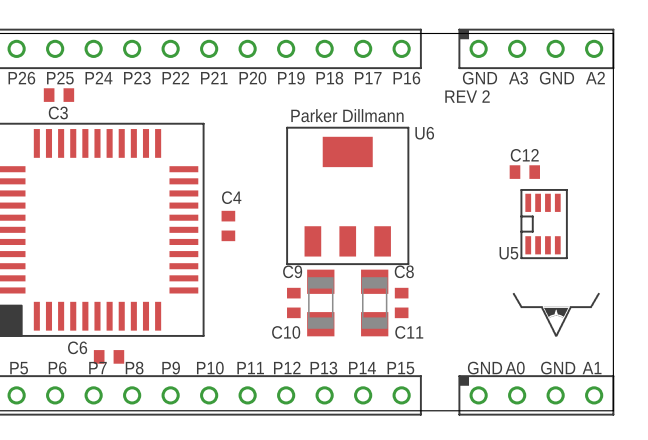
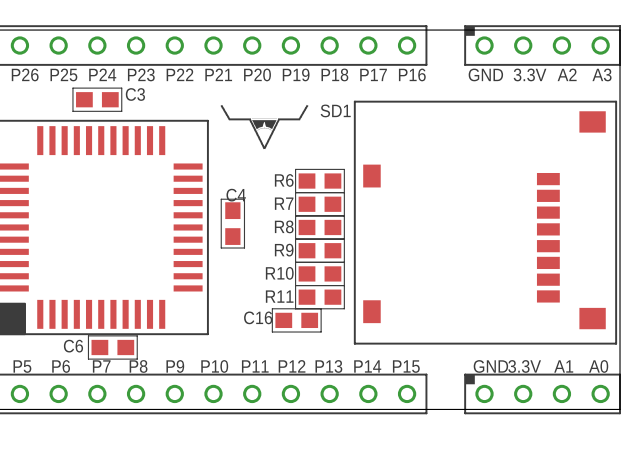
text: A3 (518, 78) -> 3.3V (530, 74)
text: GND (557, 78) -> A2 (567, 74)
text: A2 (595, 78) -> A3 (602, 74)
C3 footprint: [43, 88, 75, 102] -> [72, 87, 123, 112]
drawing: [291, 90, 490, 123] -> none
C3 name position: C3 (58, 112) -> C3 (135, 94)
C12: (524, 172) -> none
R6: none -> (319, 181)
U6: (347, 195) -> none
R7: none -> (319, 204)
C4 footprint: [221, 210, 236, 242] -> [220, 198, 245, 249]
U5: (544, 224) -> none
SD1: none -> (485, 222)
R8: none -> (319, 227)
R9: none -> (319, 250)
R10: none -> (319, 273)
R11: none -> (319, 297)
C10: (293, 302) -> none
C9: (320, 302) -> none
C8: (374, 302) -> none
C11: (401, 302) -> none
drawing position: (556, 314) -> (264, 127)
C16: none -> (296, 320)
C6 footprint: [93, 350, 125, 364] -> [88, 335, 138, 360]
text: A0 (515, 368) -> 3.3V (524, 366)
text: GND (558, 368) -> A1 (563, 366)
text: A1 (592, 368) -> A0 (598, 366)

